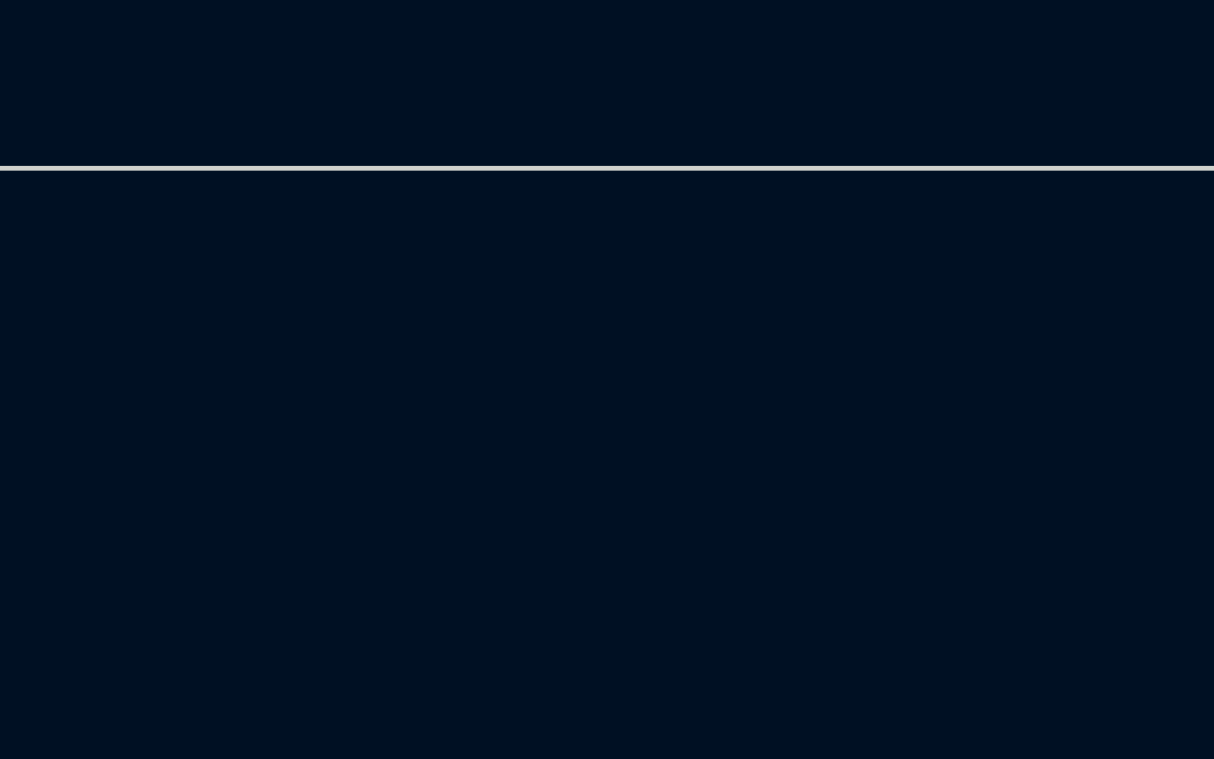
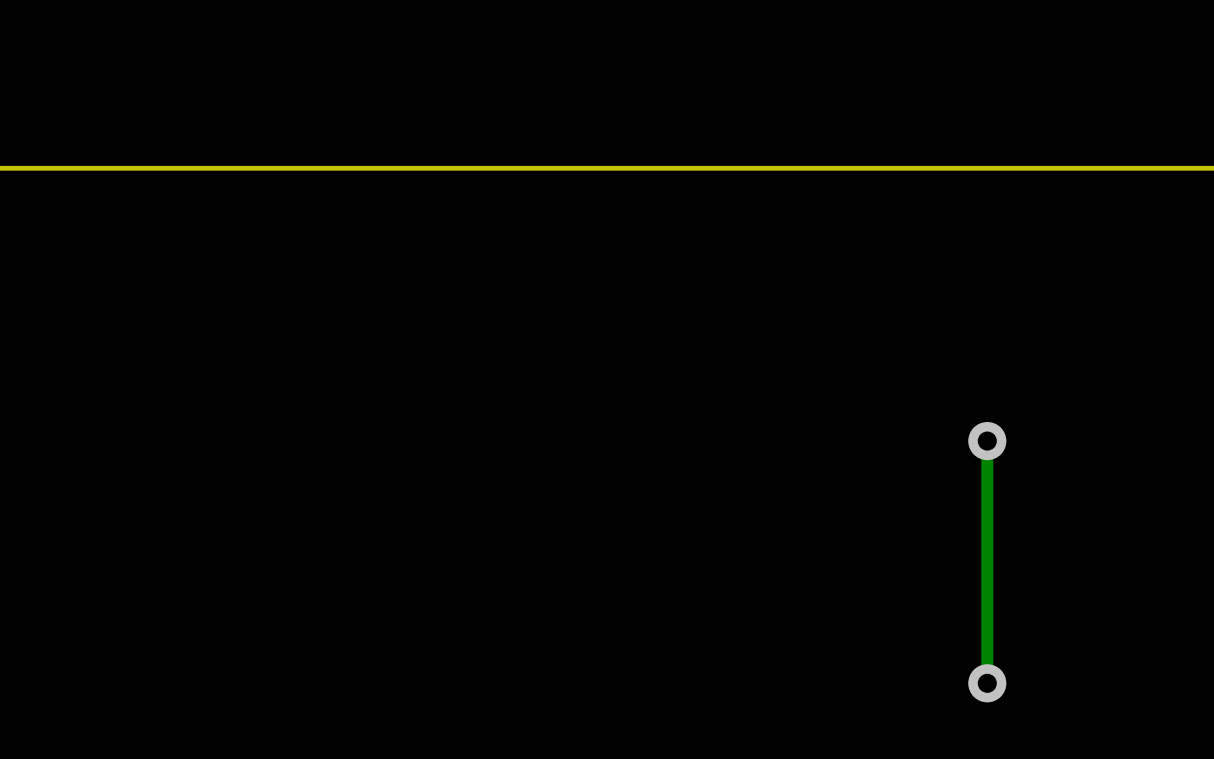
track: none -> (987, 441) (987, 683)
via: none -> (987, 441)
via: none -> (987, 683)

